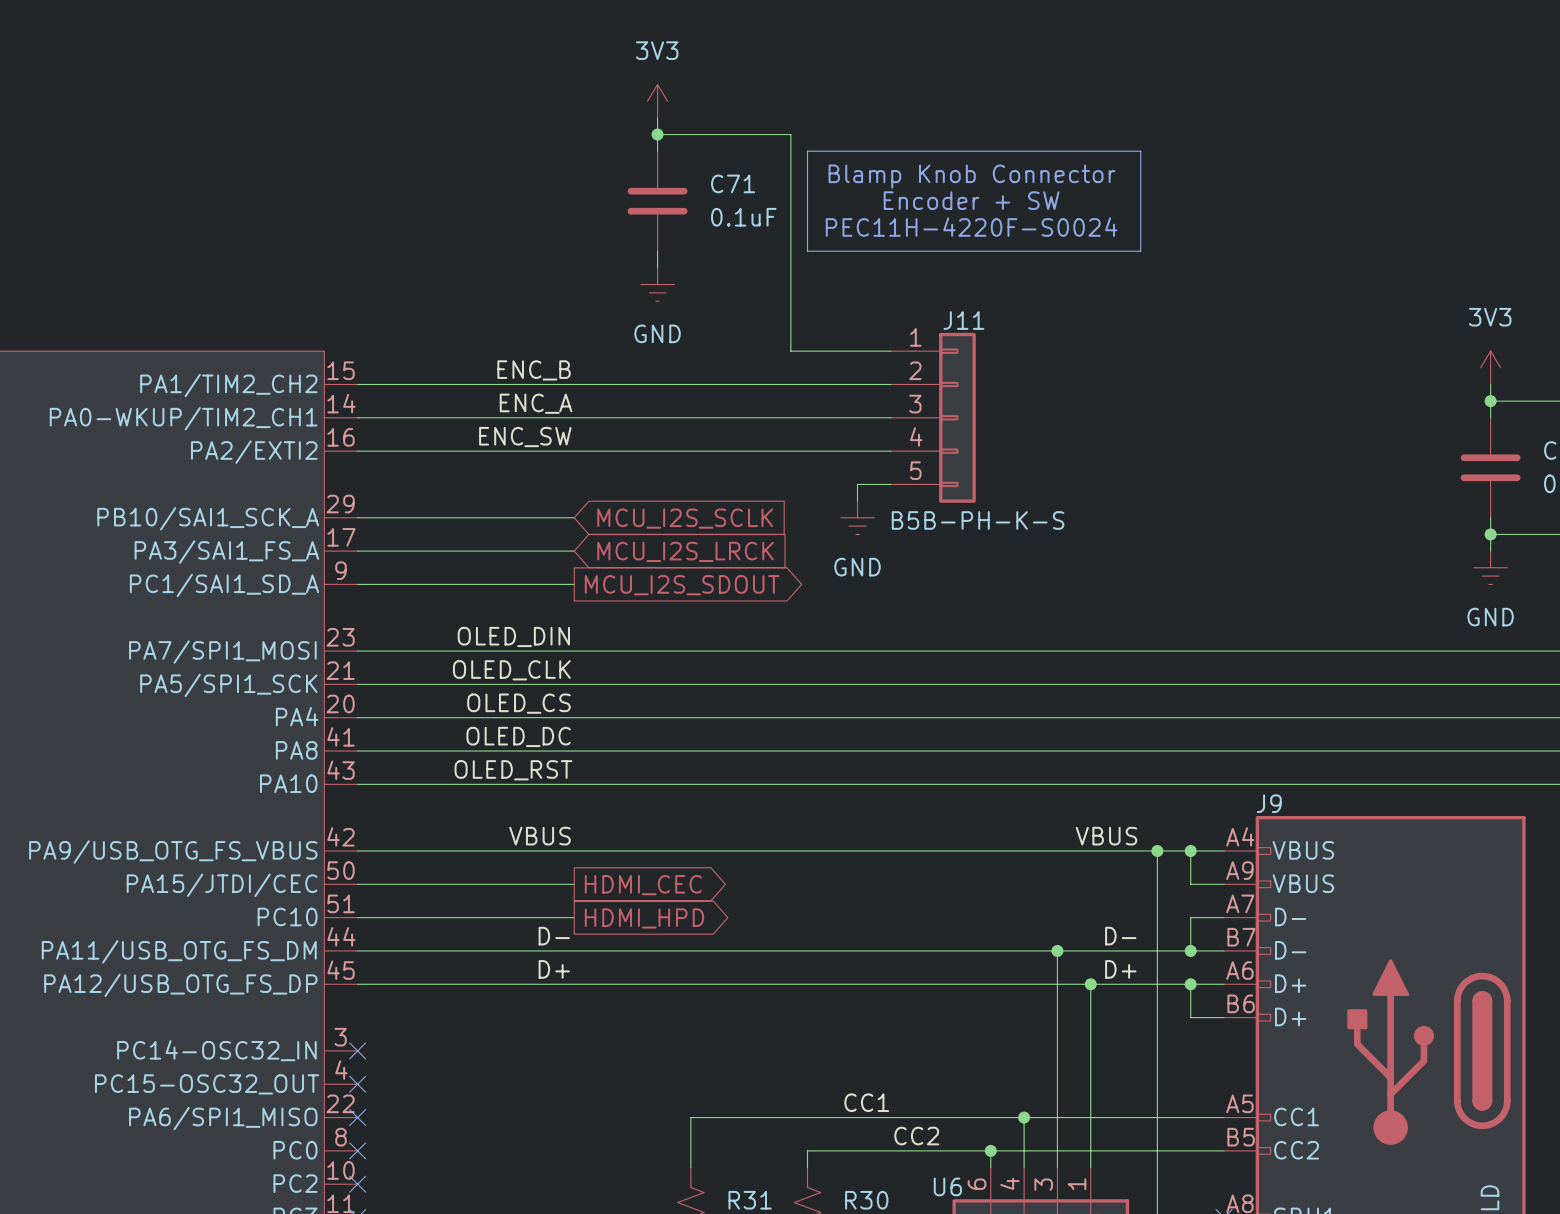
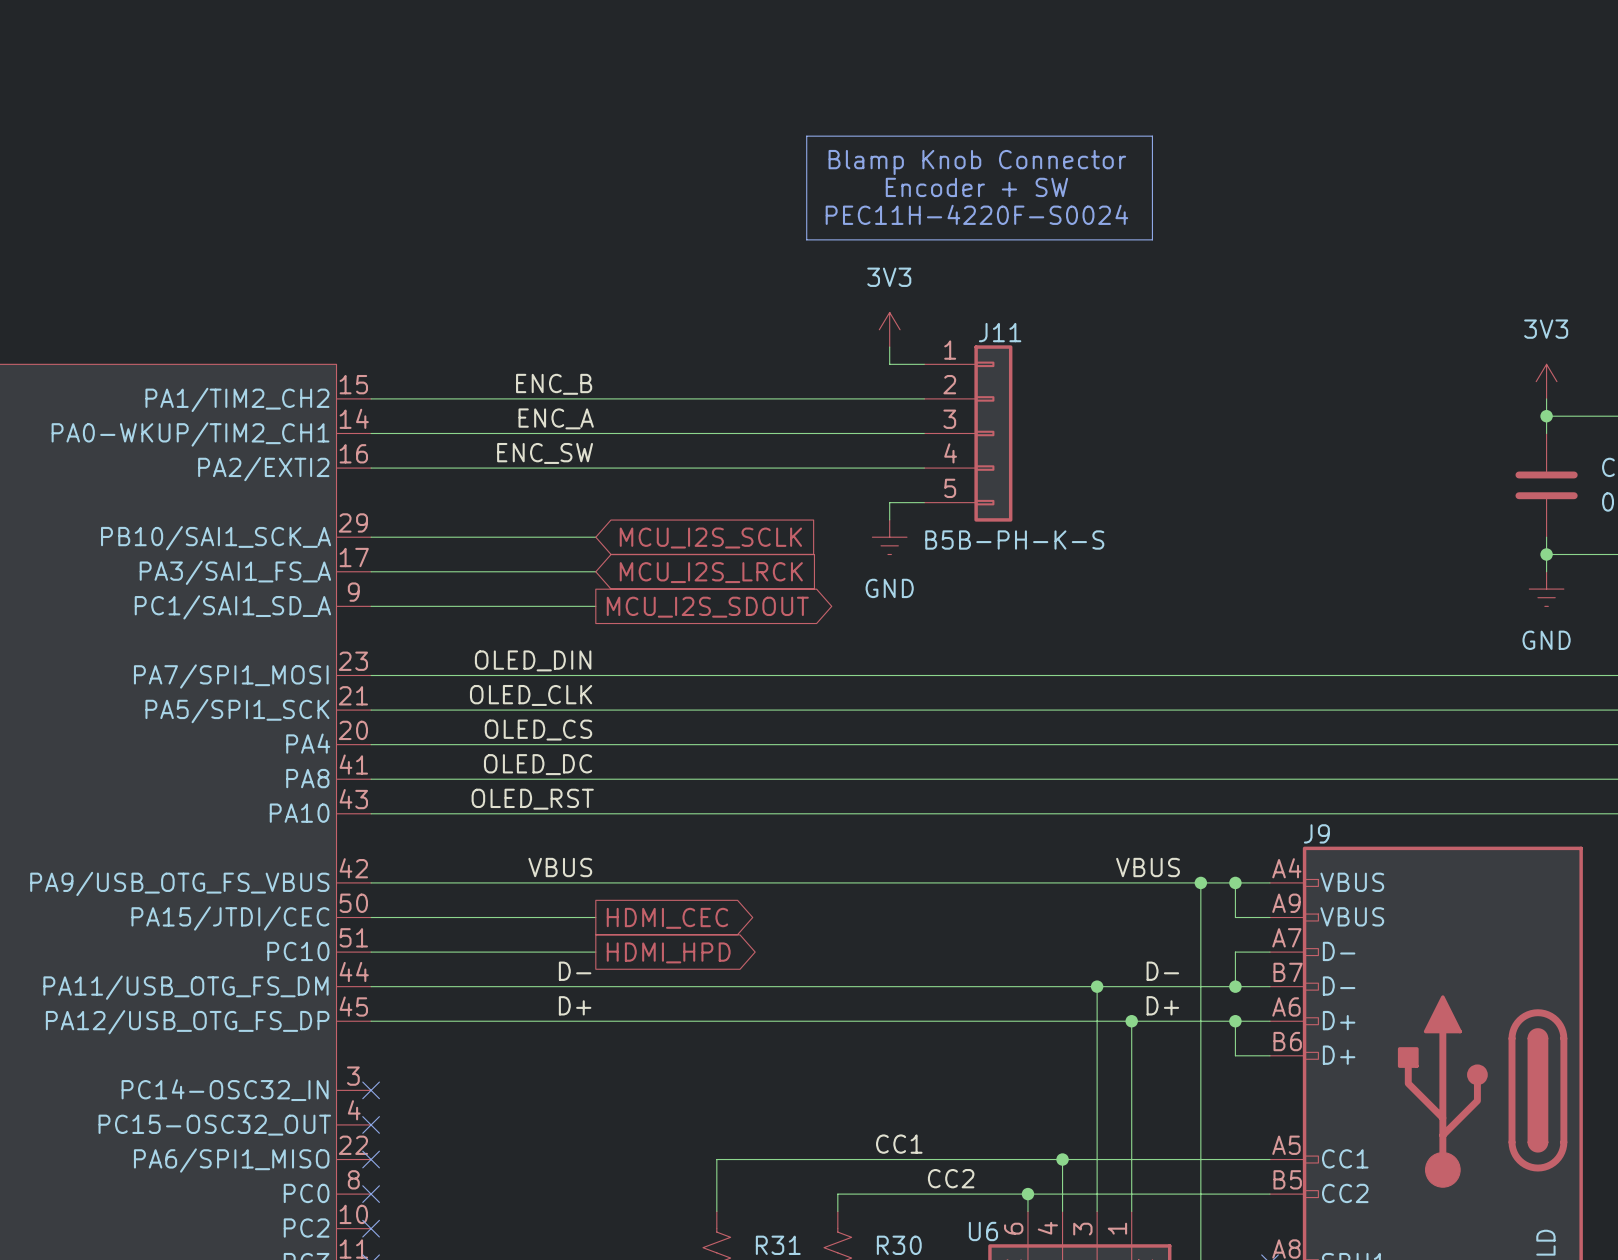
power symbol position: 3V3 (657, 101) -> 3V3 (889, 329)
wire: (657, 117) (657, 151) -> none
wire: (657, 134) (790, 134) (790, 351) (857, 351) -> (889, 347) (889, 364)
junction: (657, 134) -> none
line: (807, 151) (1140, 151) (1140, 251) (807, 251) (807, 151) -> (806, 136) (806, 239) (1152, 239) (1152, 136) (806, 136)
text position: Blamp Knob Connector (971, 176) -> Blamp Knob Connector (977, 162)
text position: Encoder + SW (971, 200) -> Encoder + SW (976, 187)
C71: 0.1uF (657, 201) -> none
text position: PEC11H-4220F-S0024 (971, 227) -> PEC11H-4220F-S0024 (976, 214)
wire: (657, 251) (657, 267) -> none
power symbol: GND (657, 284) -> none

